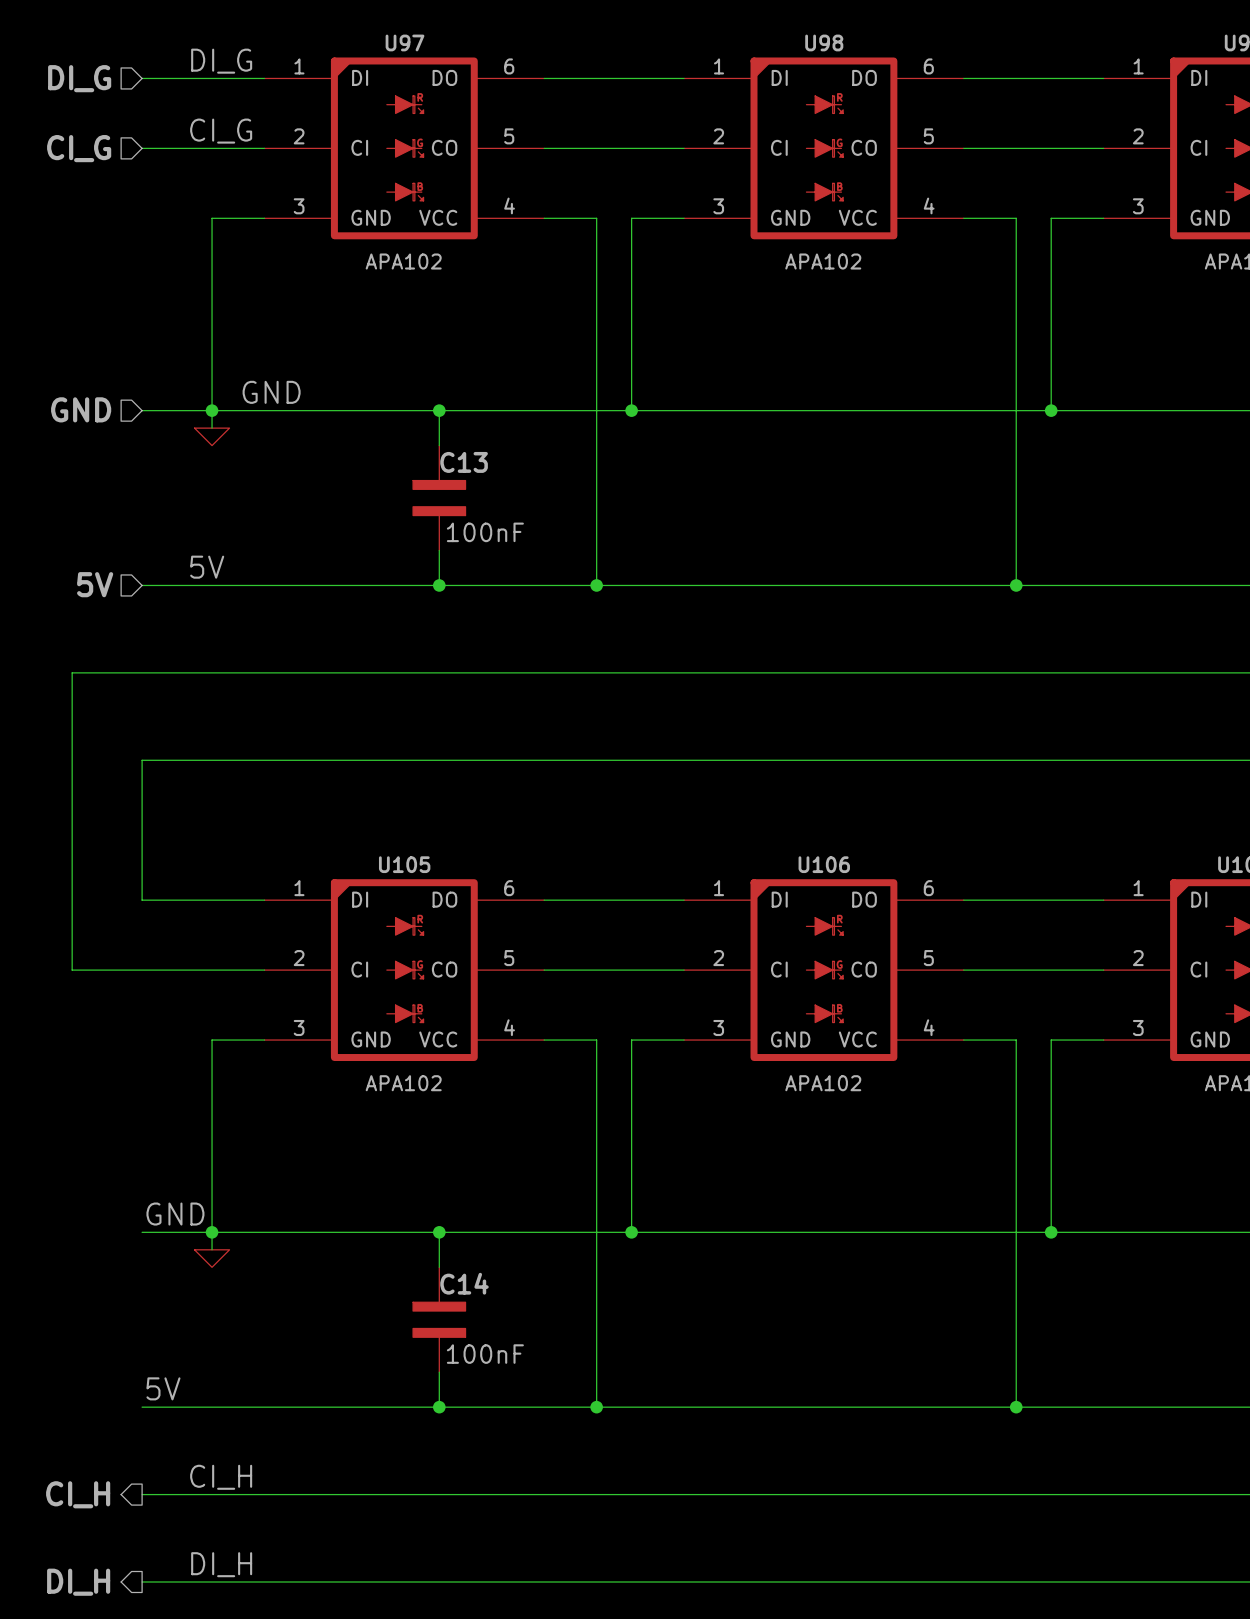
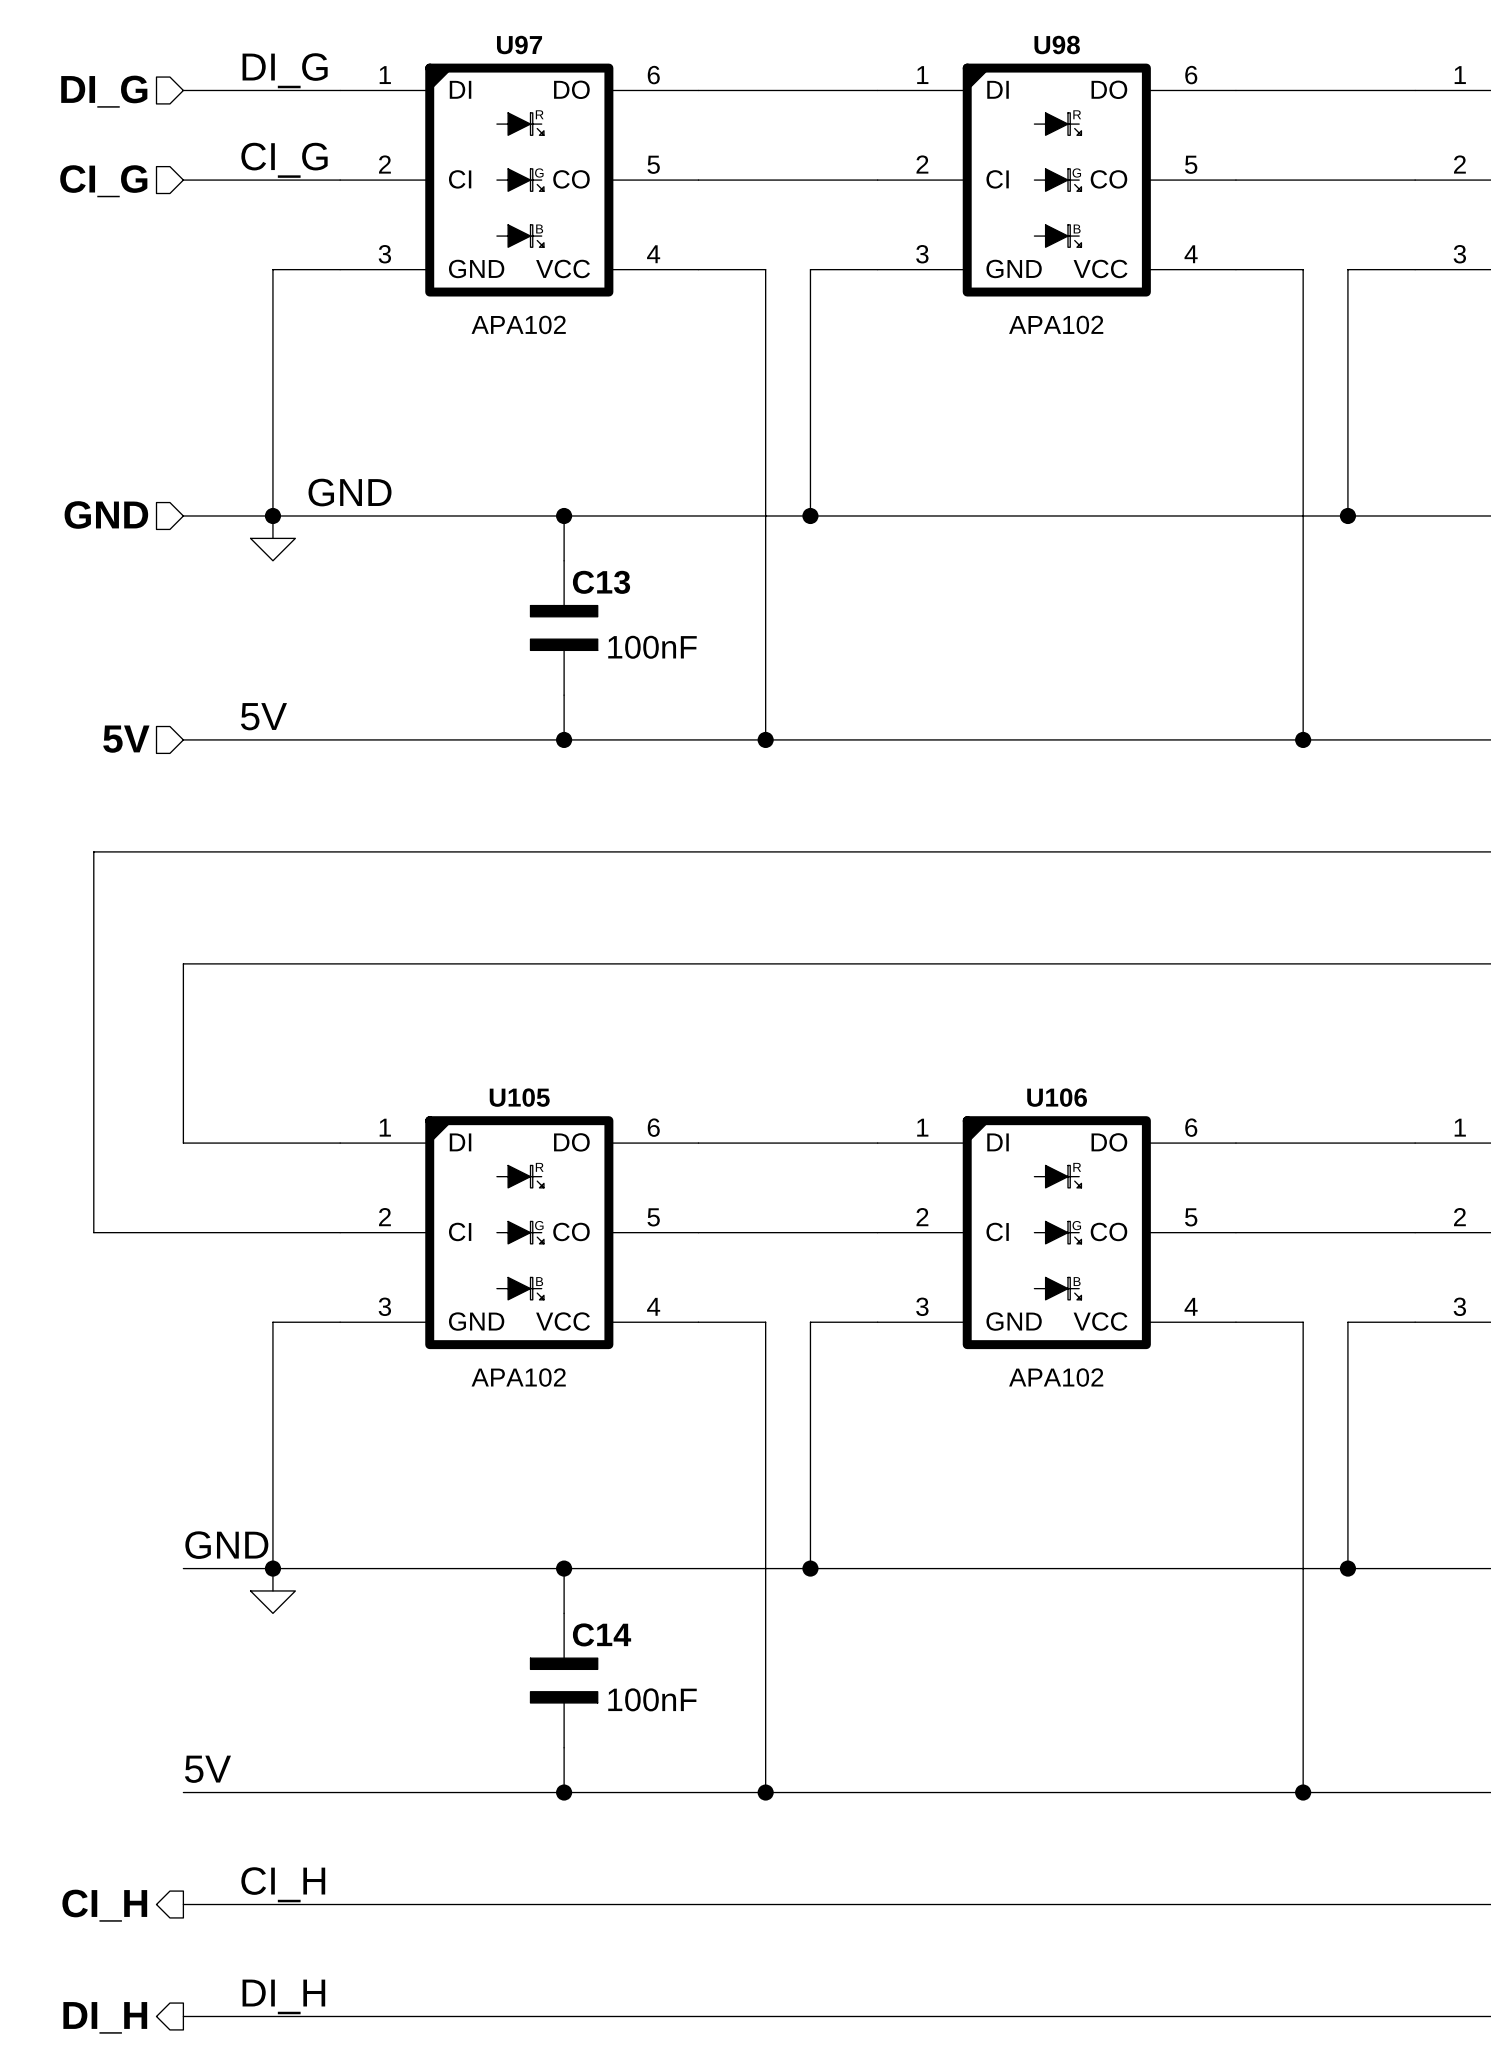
C13 value position: 100nF (485, 532) -> 100nF (652, 647)
C14 value position: 100nF (485, 1354) -> 100nF (652, 1699)

